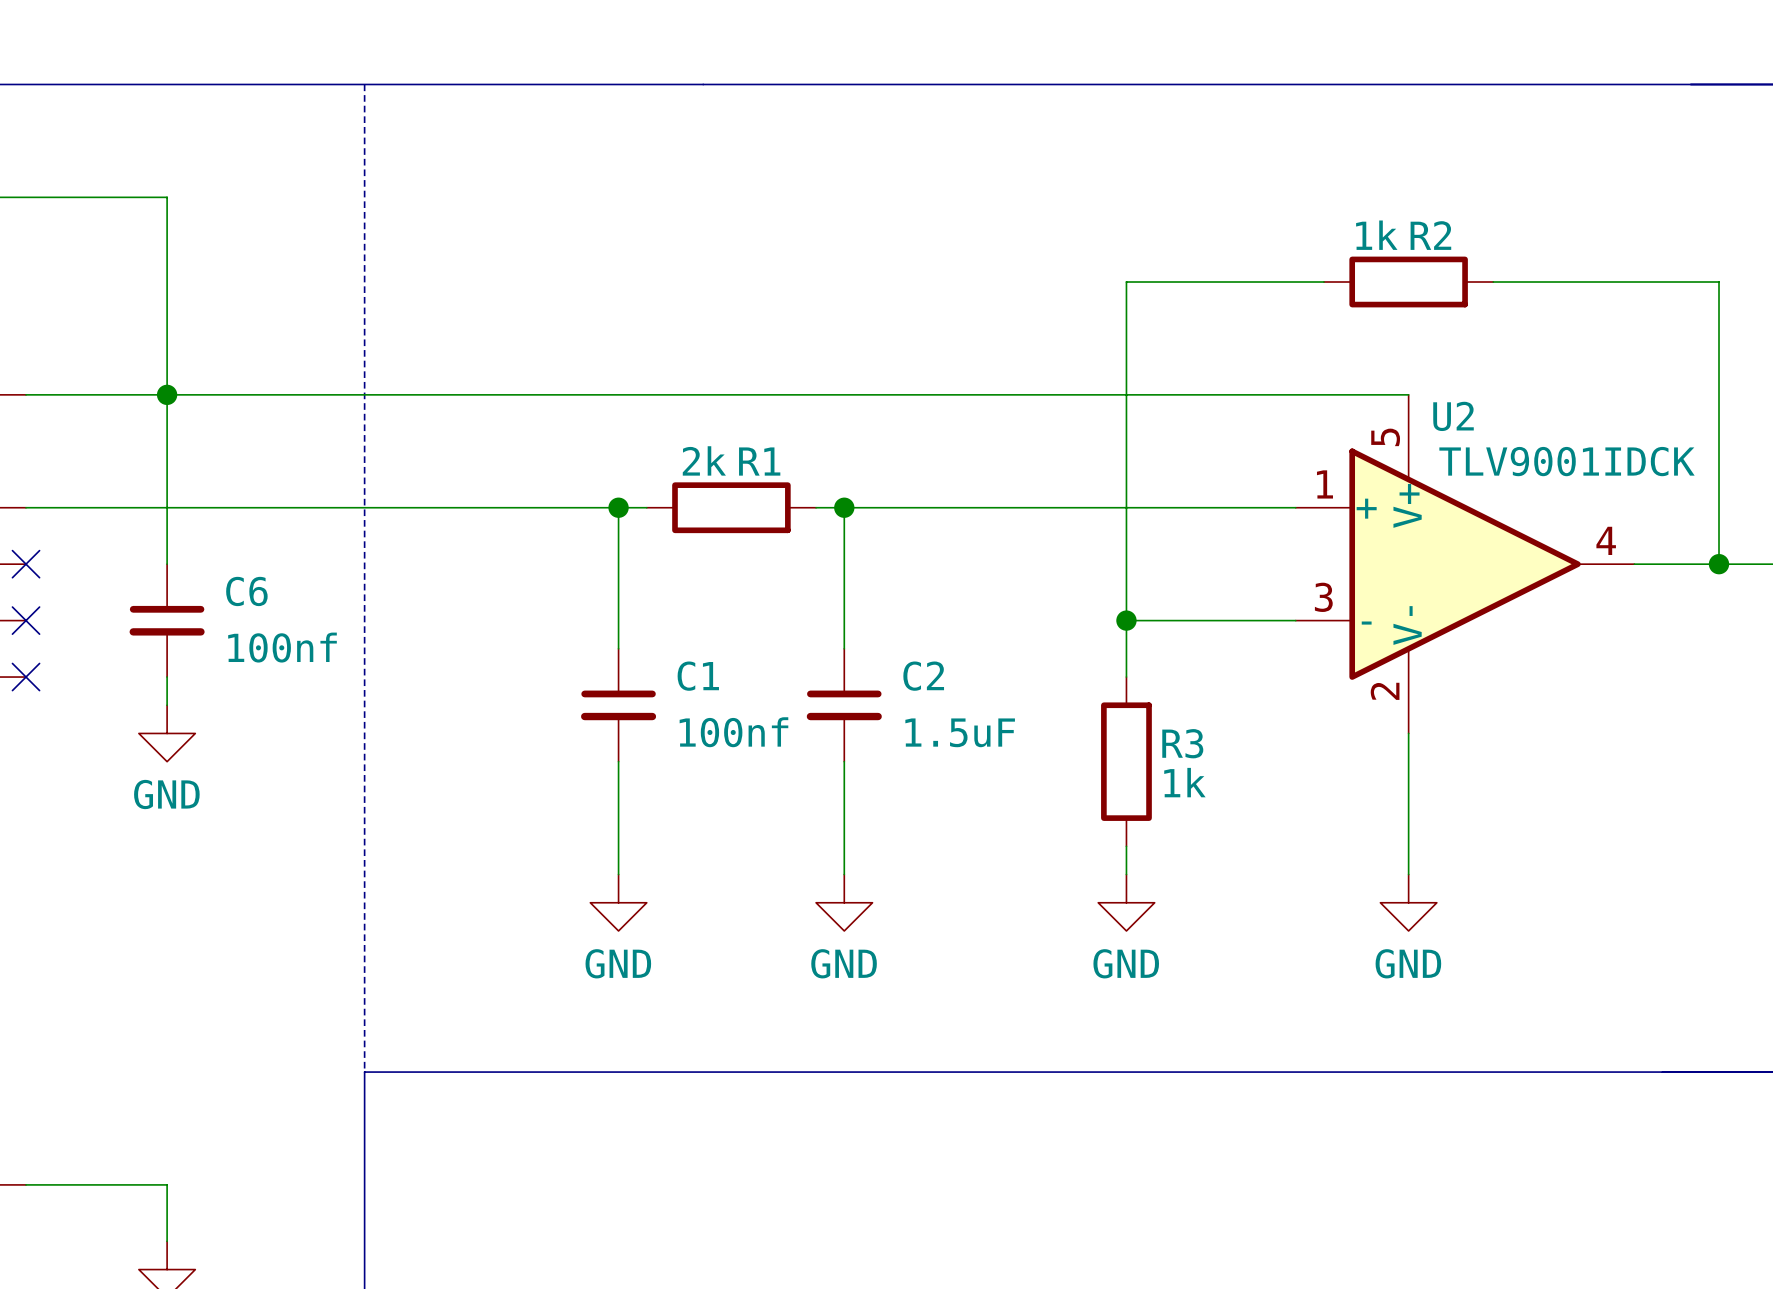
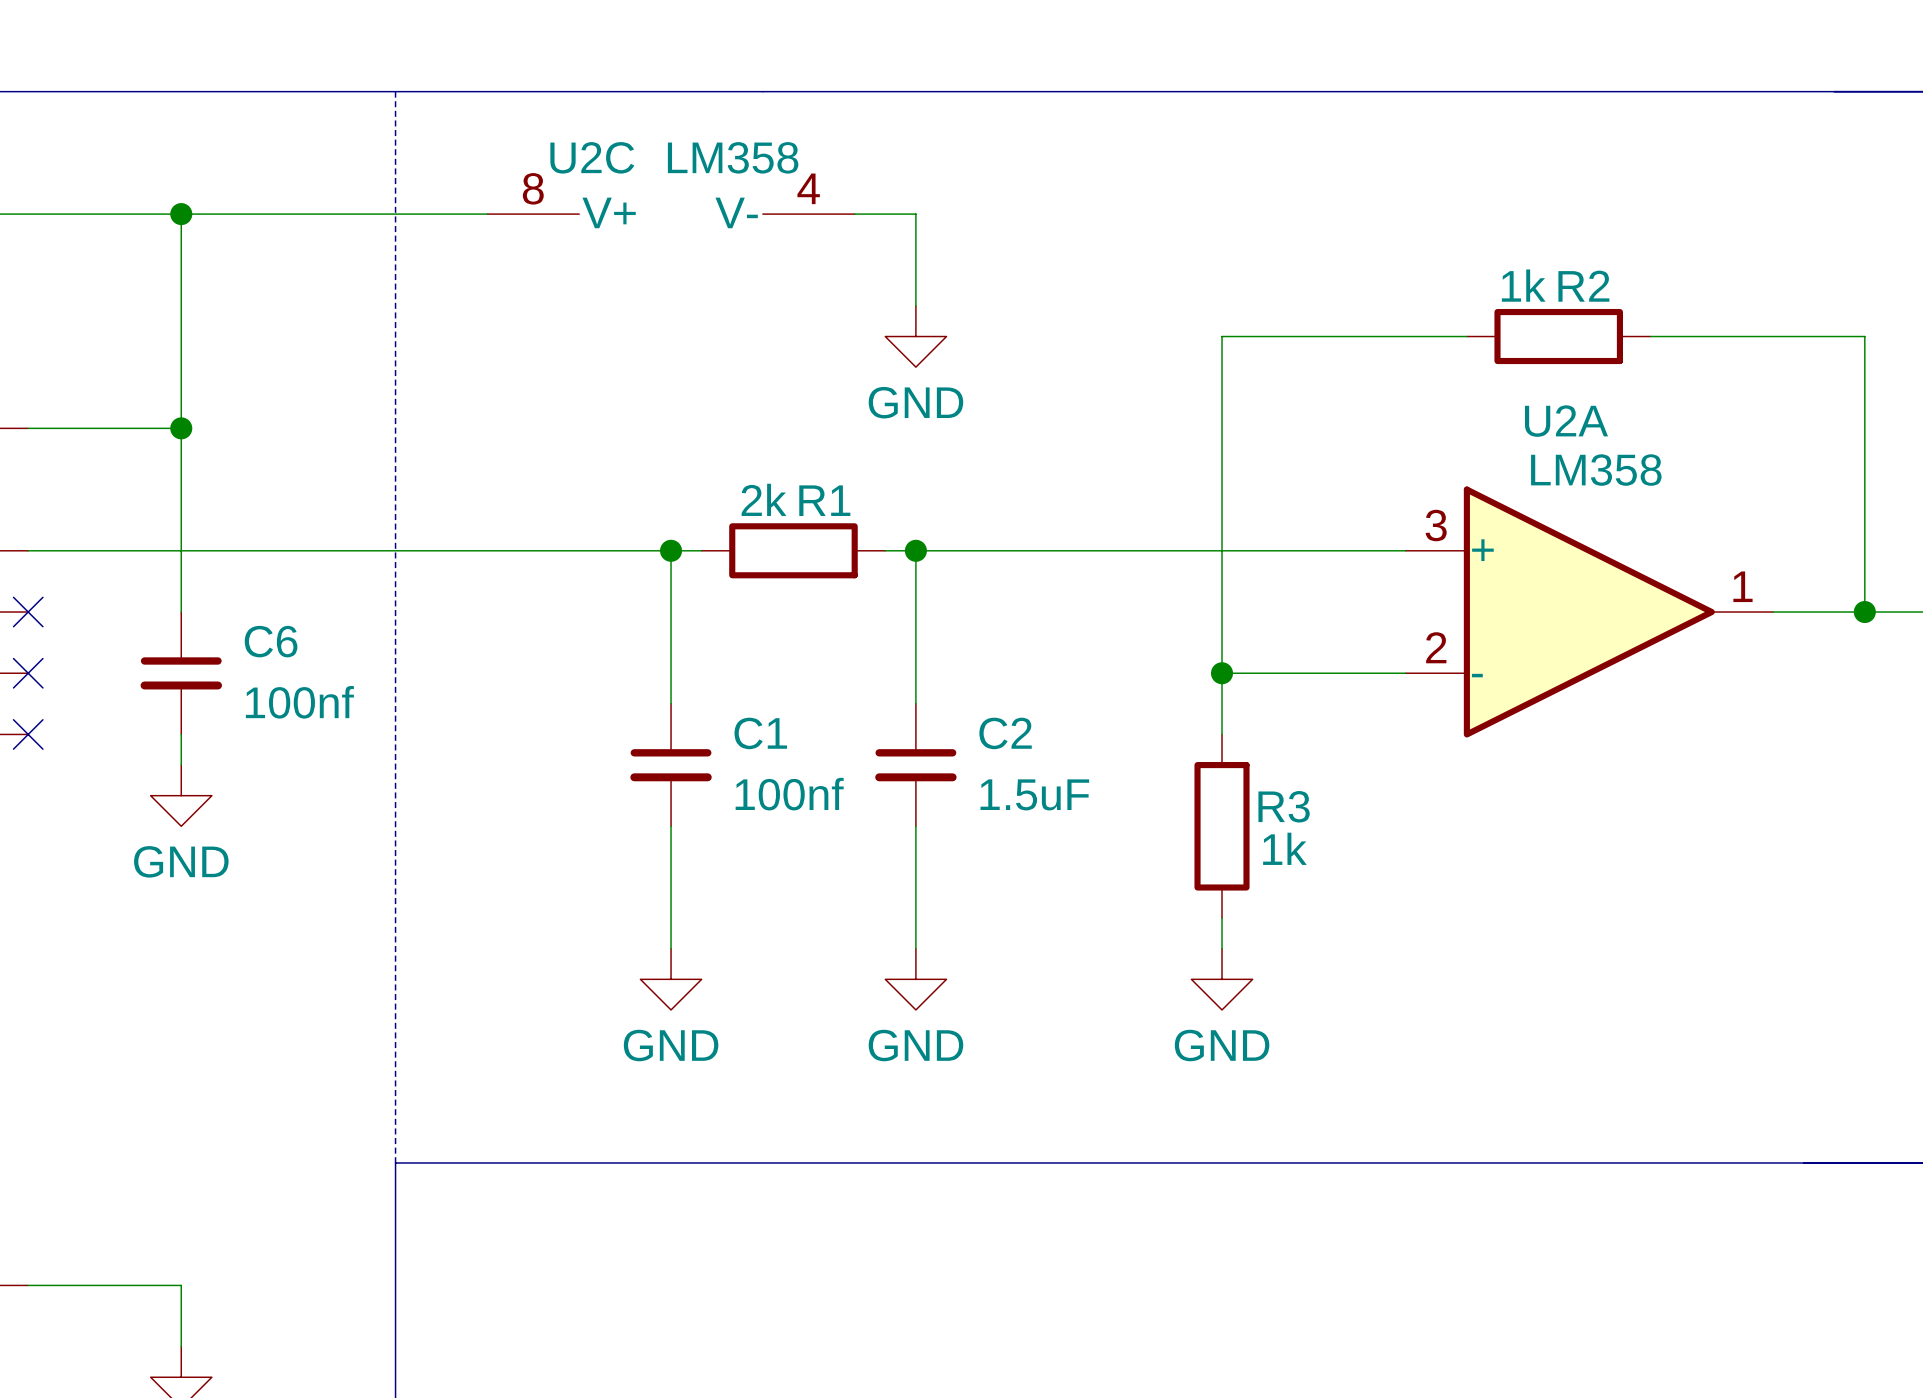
wire: none -> (181, 214) (487, 214)
junction: none -> (181, 214)
U2C: none -> LM358 (671, 214)
wire: none -> (854, 214) (915, 214) (915, 305)
wire: (1323, 282) (1126, 282) (1126, 310) -> (1466, 336) (1222, 336)
R2 position: (1408, 282) -> (1558, 336)
wire: (1493, 282) (1719, 282) (1719, 310) -> (1650, 336) (1864, 336)
power symbol: none -> GND (915, 336)
wire: (167, 394) (1408, 394) -> none
U2: TLV9001IDCK (1465, 564) -> none
U2A: none -> LM358 (1589, 612)
wire: (1408, 733) (1408, 874) -> none
power symbol: GND (1408, 902) -> none

